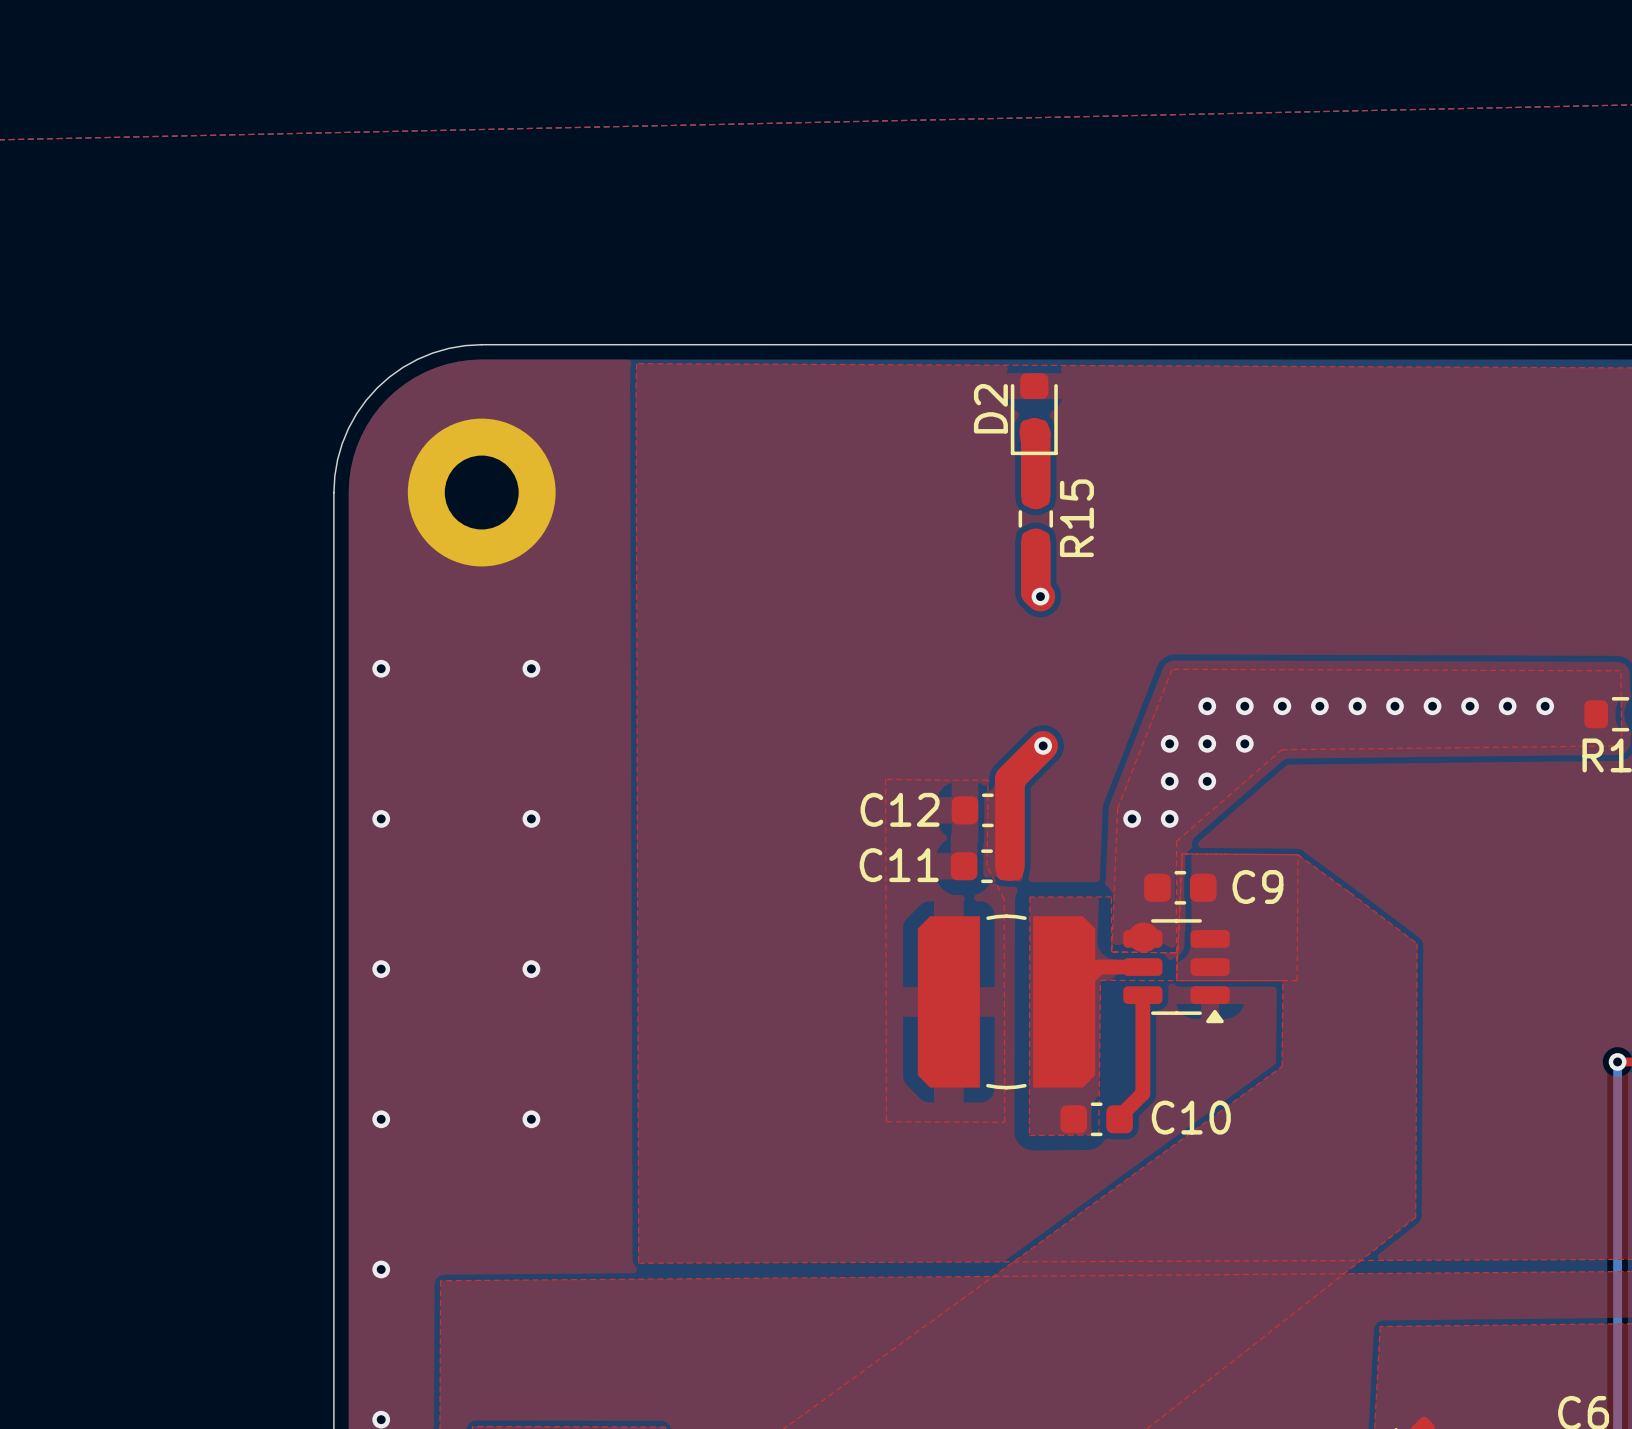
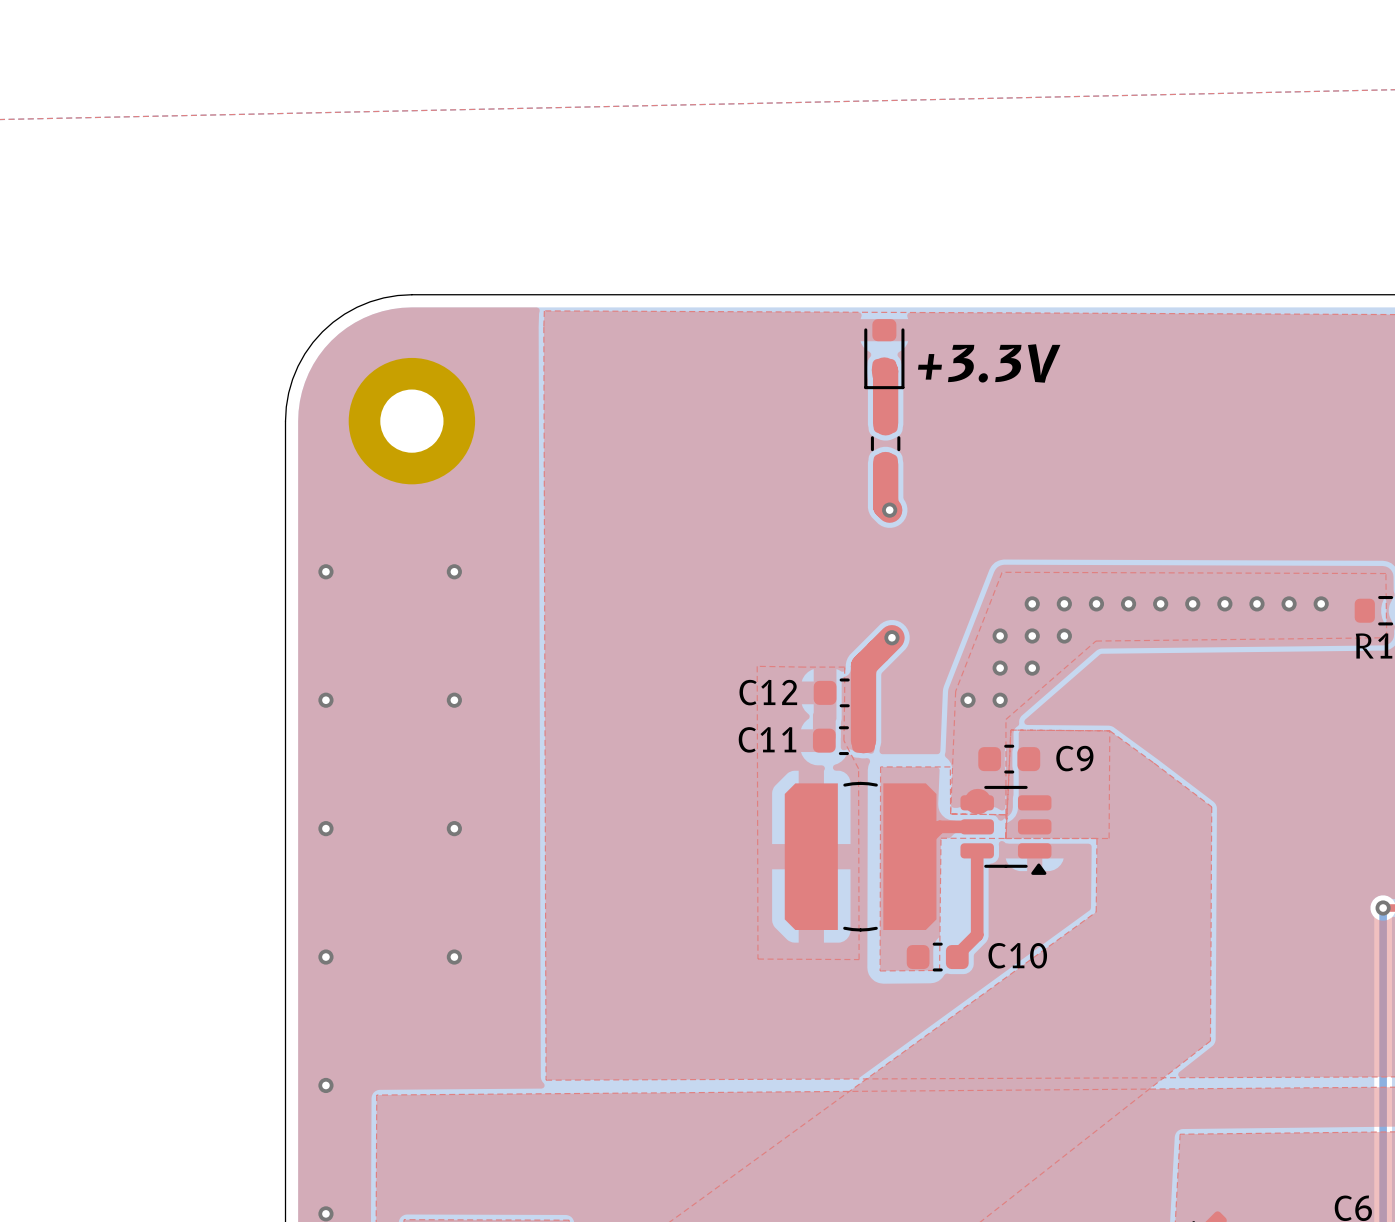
D2 name: D2 (990, 408) -> none
text: none -> +3.3V (989, 363)
R15 name: R15 (1076, 518) -> none

